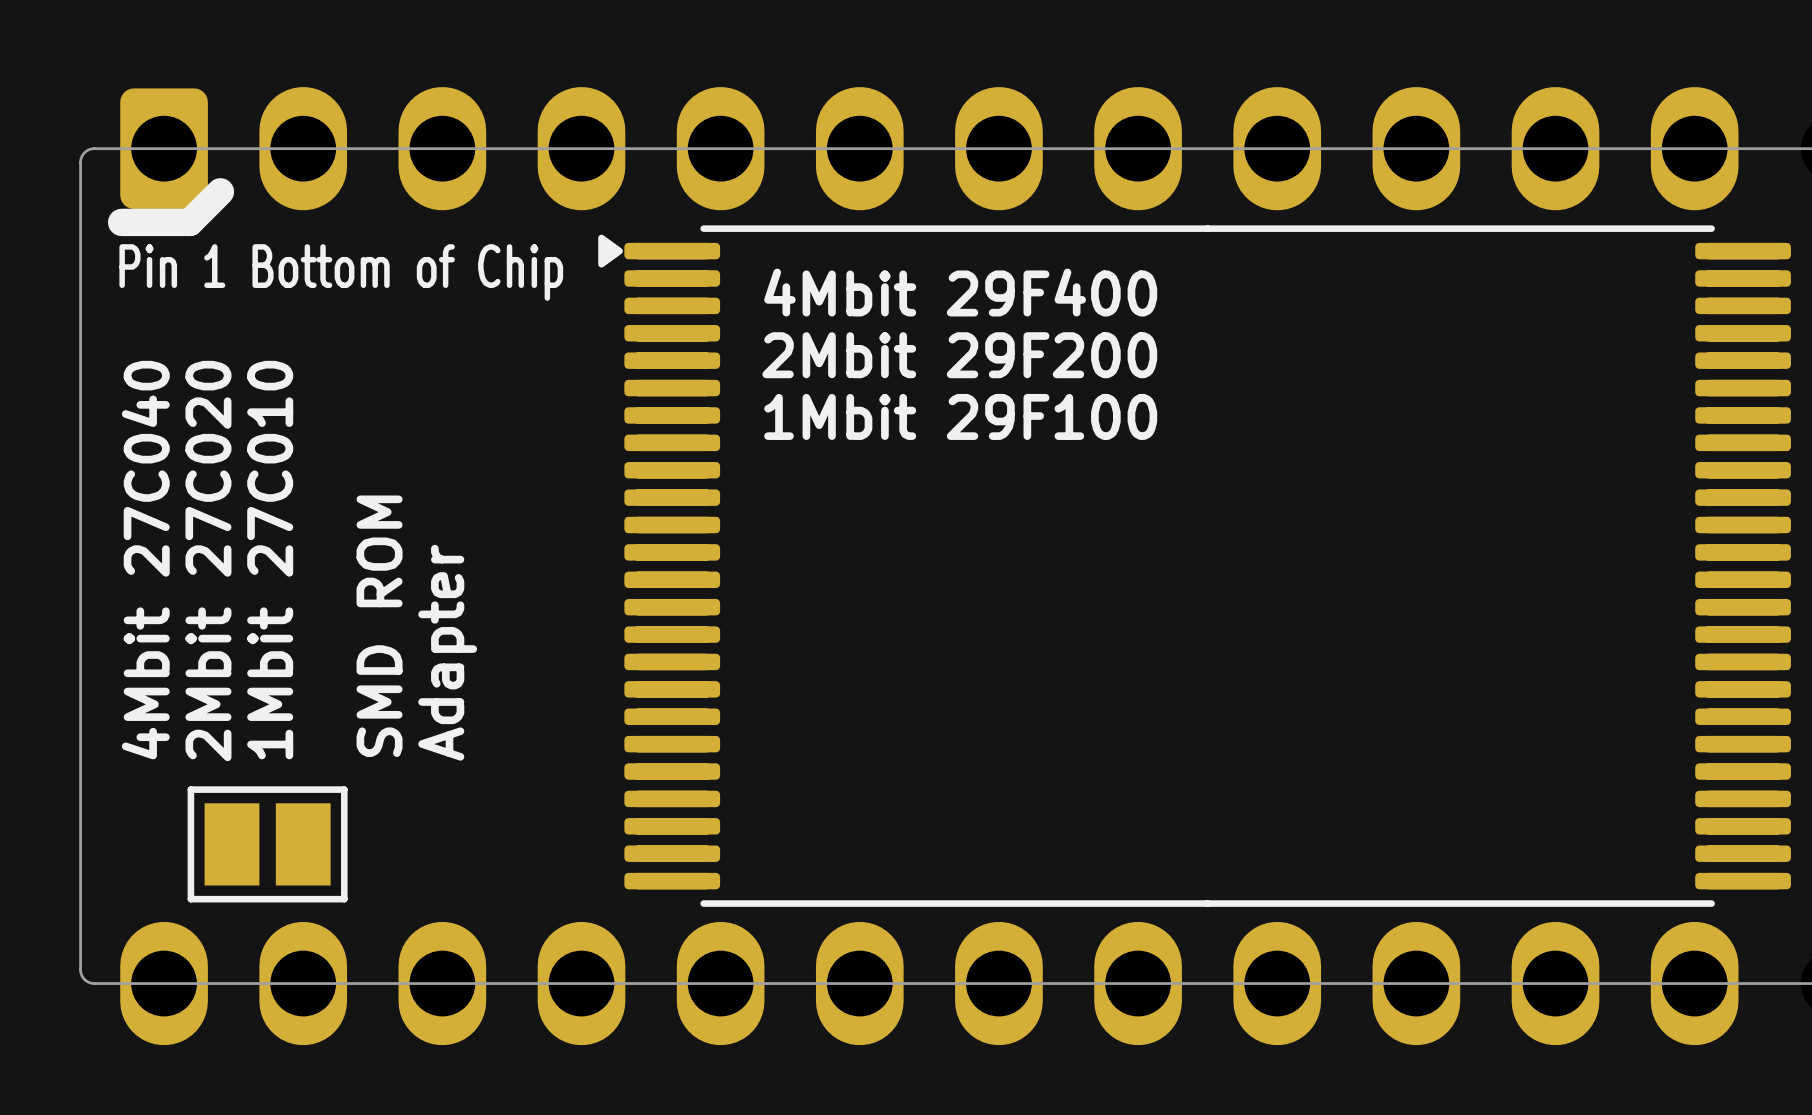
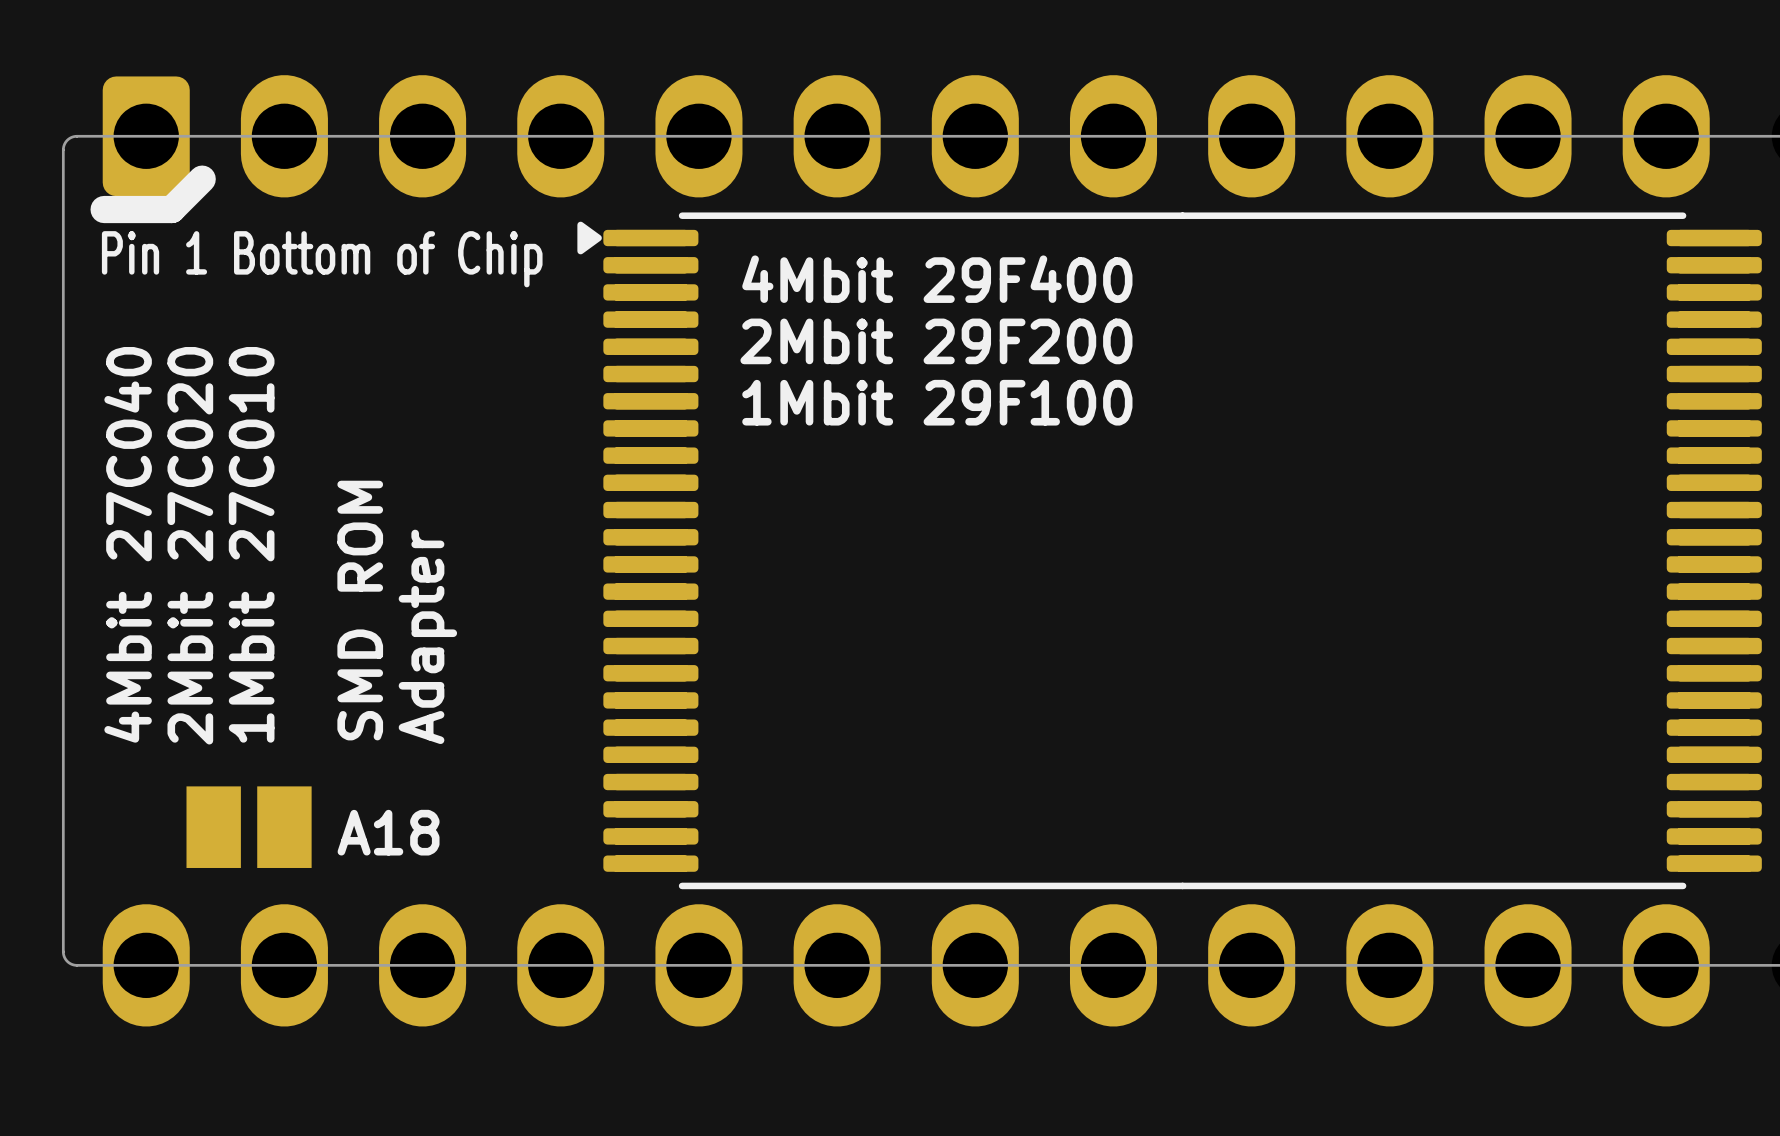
part footprint: [187, 786, 348, 903] -> [186, 786, 312, 868]
text: none -> A18 (388, 832)

